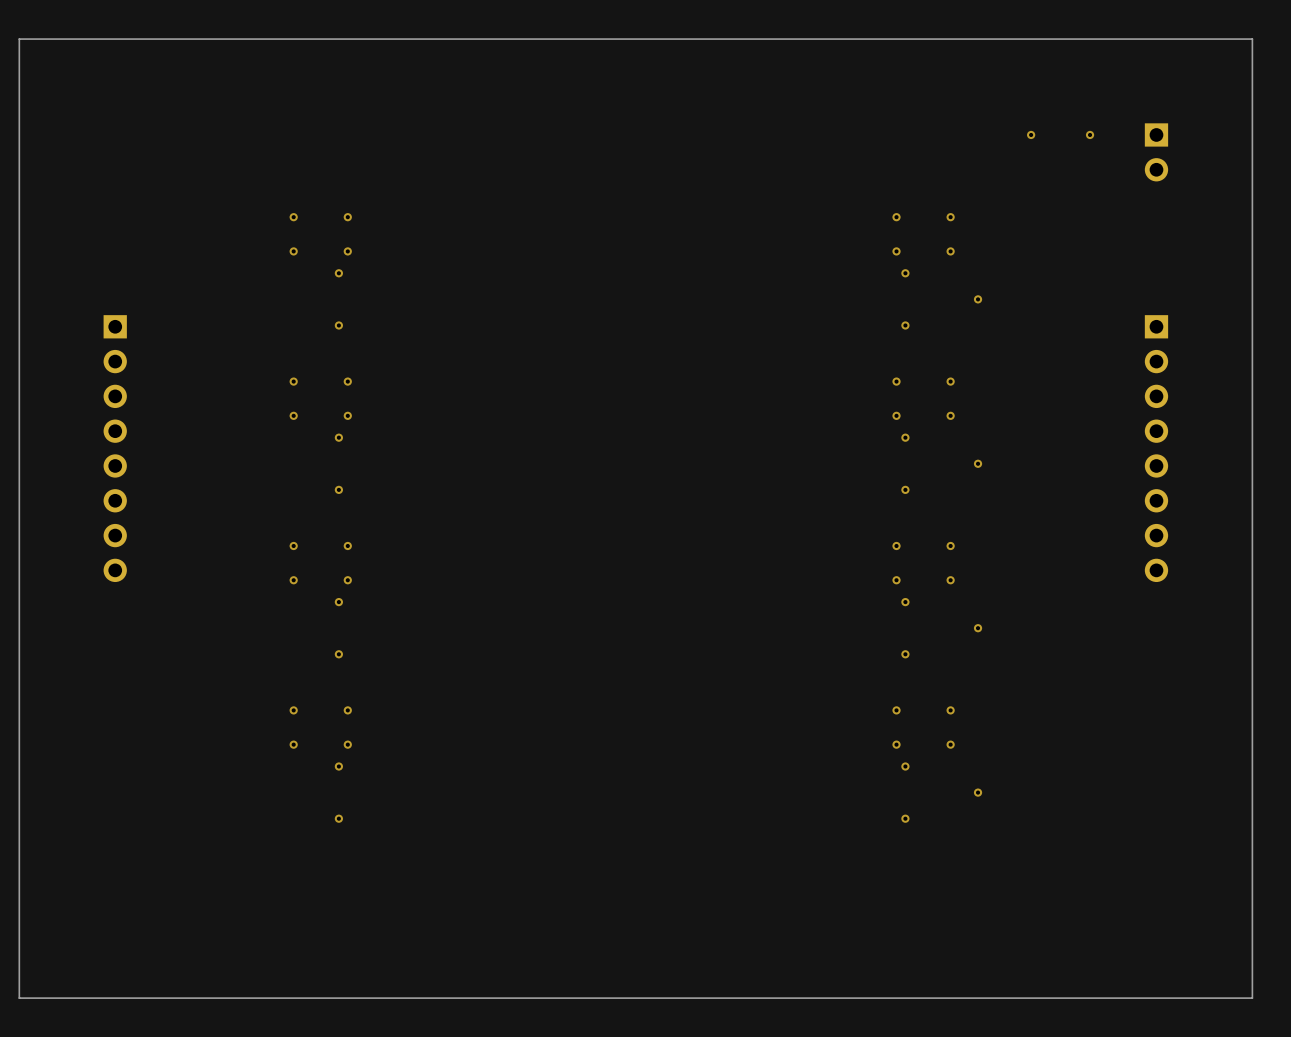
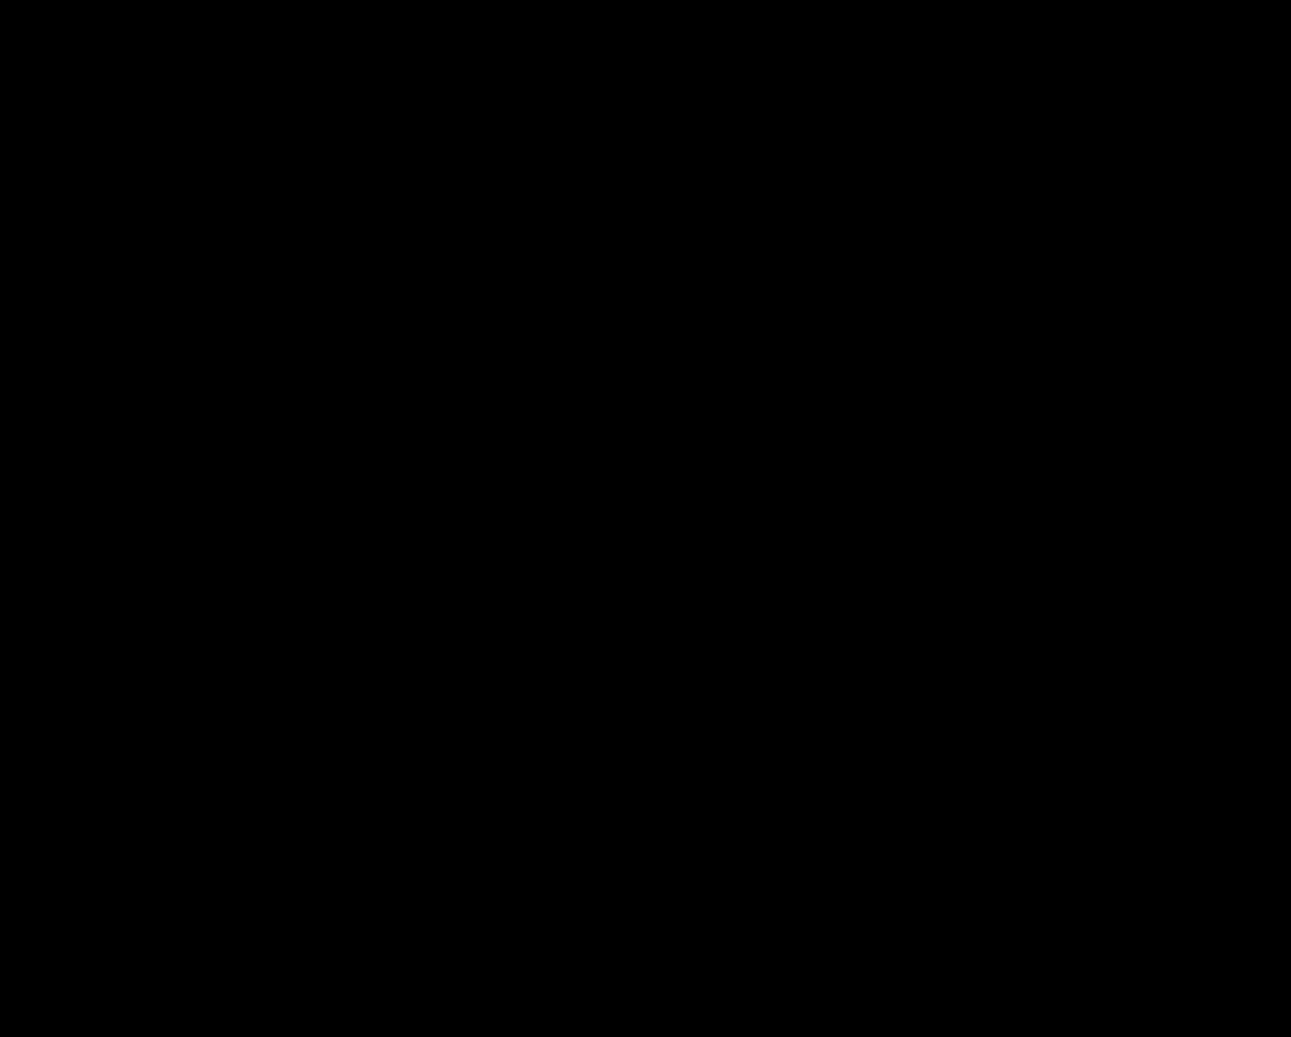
board edge: (1252, 39) (19, 39) (19, 998) (1252, 998) (1252, 39) -> none
via: (1031, 134) -> none
via: (1090, 134) -> none
part: (1156, 152) -> none
via: (293, 217) -> none
via: (347, 217) -> none
via: (896, 217) -> none
via: (950, 217) -> none
via: (293, 251) -> none
via: (347, 251) -> none
via: (896, 251) -> none
via: (950, 251) -> none
via: (338, 273) -> none
via: (905, 273) -> none
via: (978, 299) -> none
via: (338, 325) -> none
via: (905, 325) -> none
via: (293, 381) -> none
via: (347, 381) -> none
via: (896, 381) -> none
via: (950, 381) -> none
via: (293, 415) -> none
via: (347, 415) -> none
via: (896, 415) -> none
via: (950, 415) -> none
via: (338, 437) -> none
via: (905, 437) -> none
part: (115, 448) -> none
part: (1156, 448) -> none
via: (978, 463) -> none
via: (338, 489) -> none
via: (905, 489) -> none
via: (293, 545) -> none
via: (347, 545) -> none
via: (896, 545) -> none
via: (950, 545) -> none
via: (293, 580) -> none
via: (347, 580) -> none
via: (896, 580) -> none
via: (950, 580) -> none
via: (338, 602) -> none
via: (905, 602) -> none
via: (978, 628) -> none
via: (338, 654) -> none
via: (905, 654) -> none
via: (293, 710) -> none
via: (347, 710) -> none
via: (896, 710) -> none
via: (950, 710) -> none
via: (293, 744) -> none
via: (347, 744) -> none
via: (896, 744) -> none
via: (950, 744) -> none
via: (338, 766) -> none
via: (905, 766) -> none
via: (978, 792) -> none
via: (338, 818) -> none
via: (905, 818) -> none

